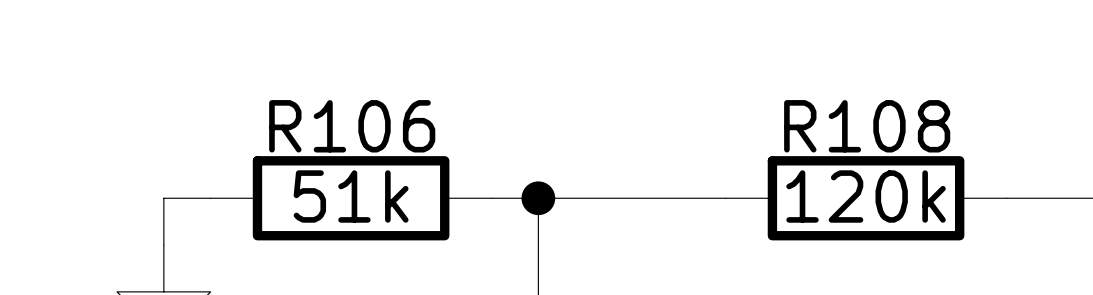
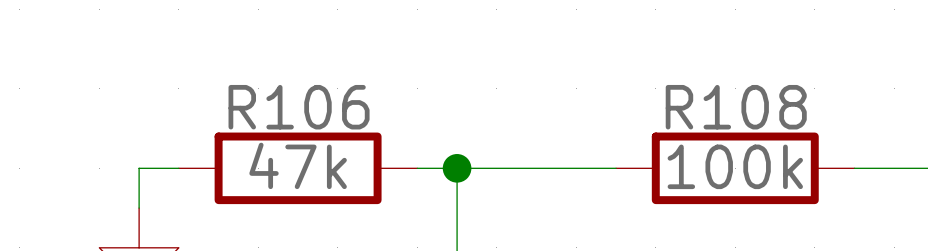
R106 value: 51k (351, 196) -> 47k (298, 165)
R108 value: 120k (866, 196) -> 100k (735, 166)

